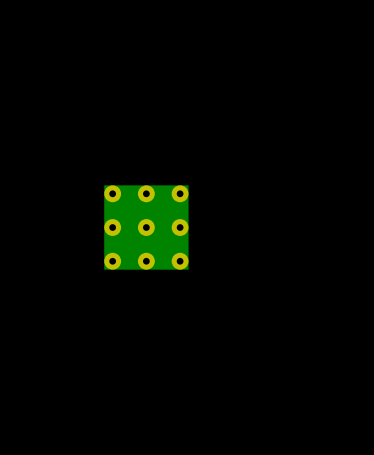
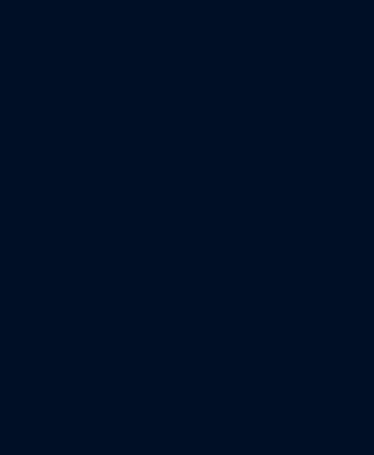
part: (146, 227) -> none

